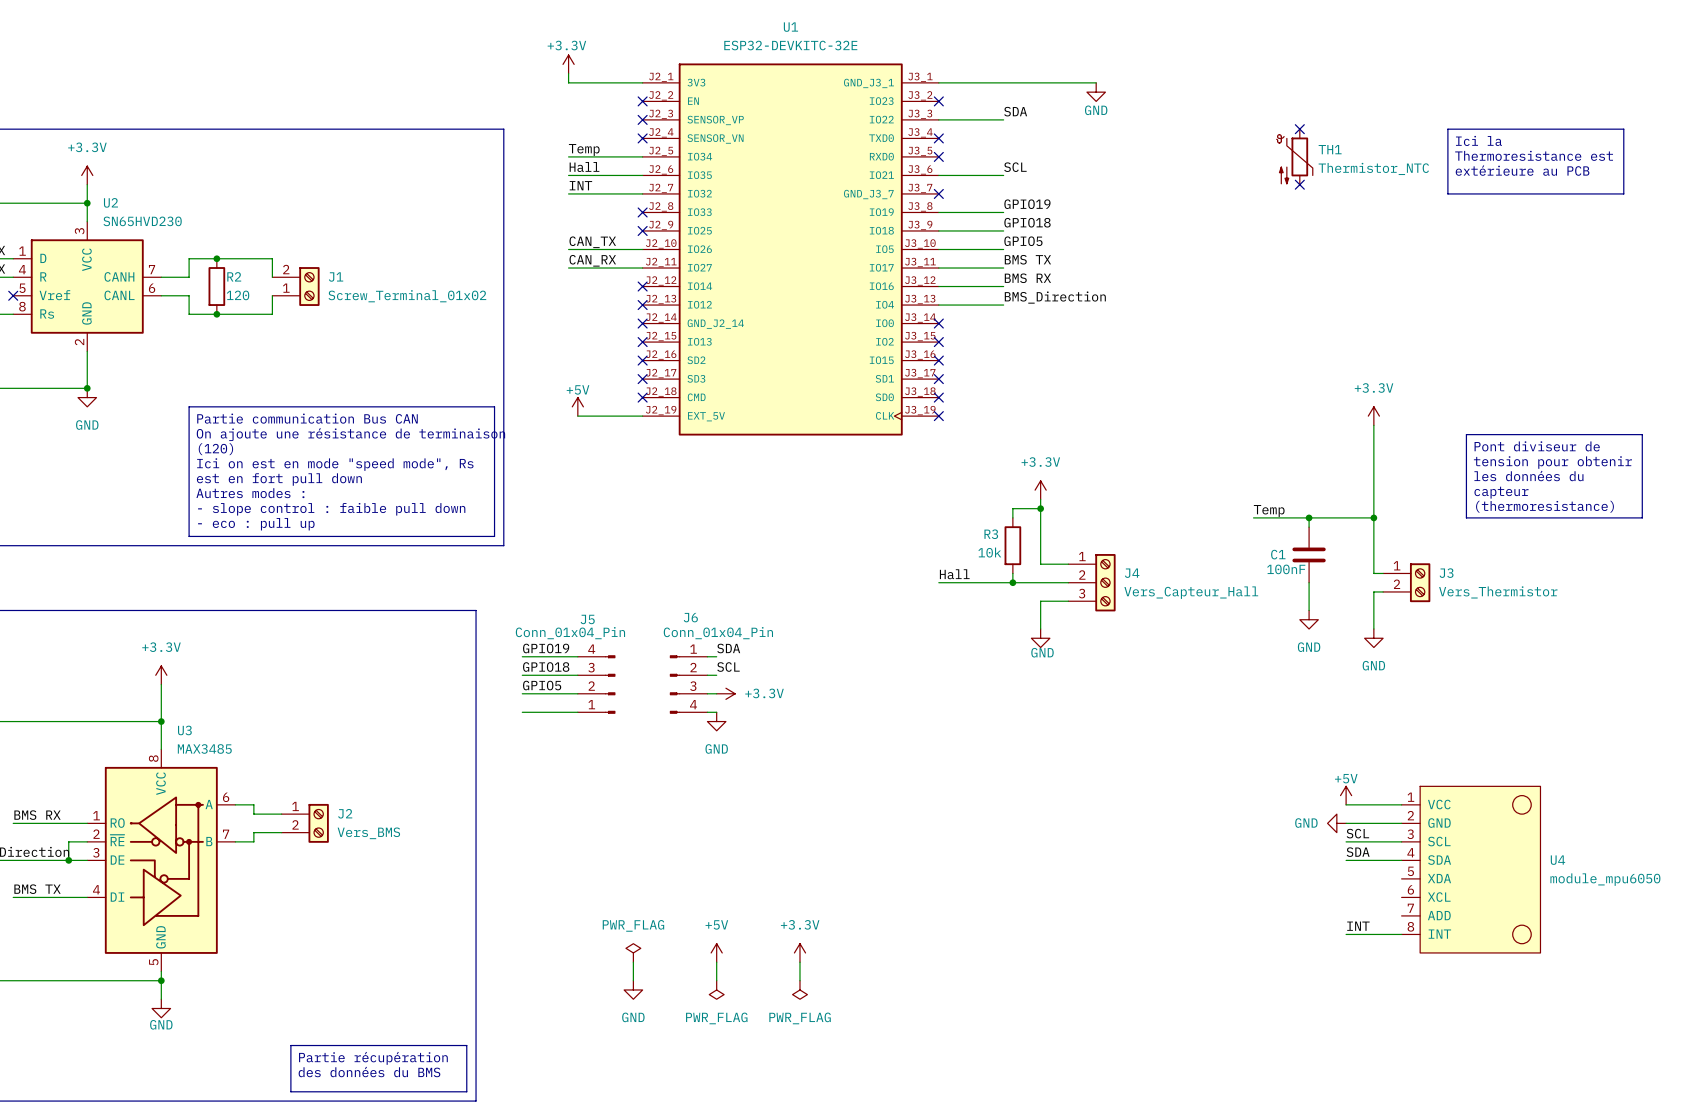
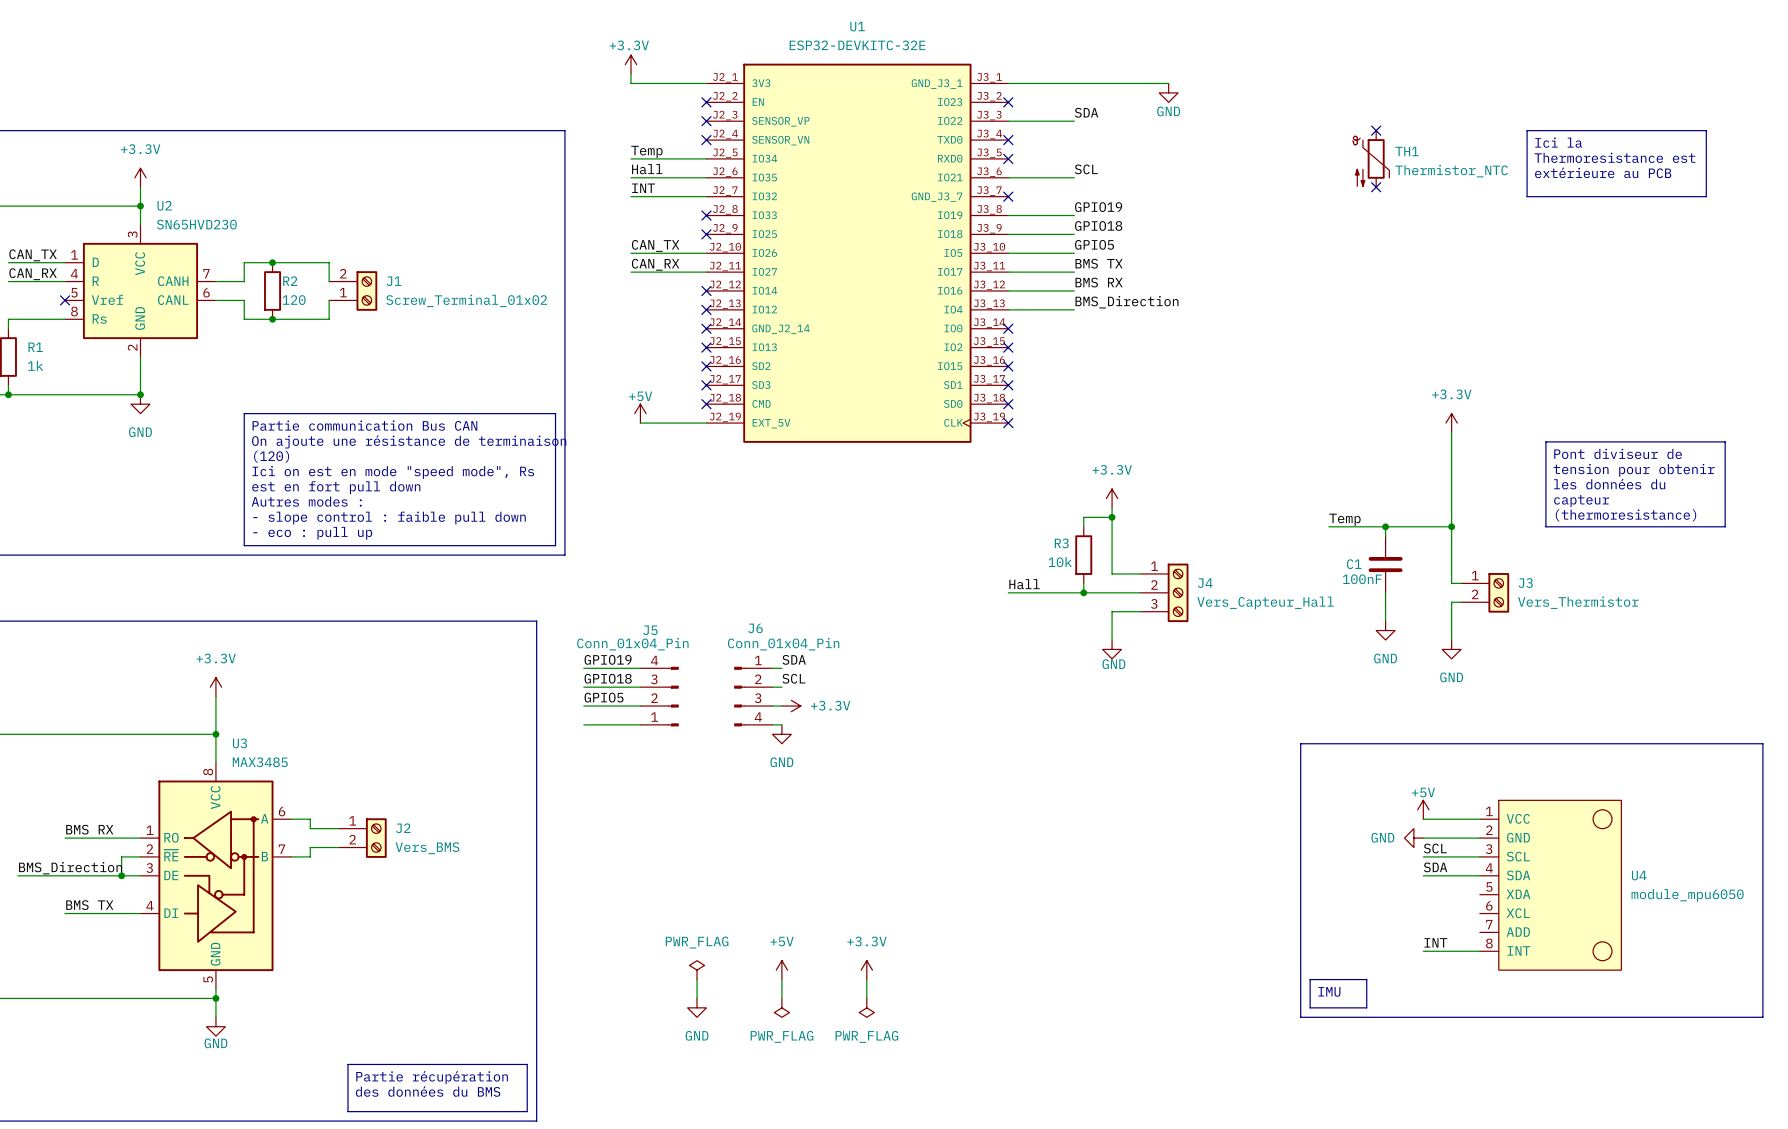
line: none -> (1300, 743) (1762, 743) (1762, 1017) (1300, 1017) (1300, 743)
line: none -> (1310, 979) (1366, 979) (1366, 1007) (1310, 1007) (1310, 979)
text: none -> IMU (1329, 991)

